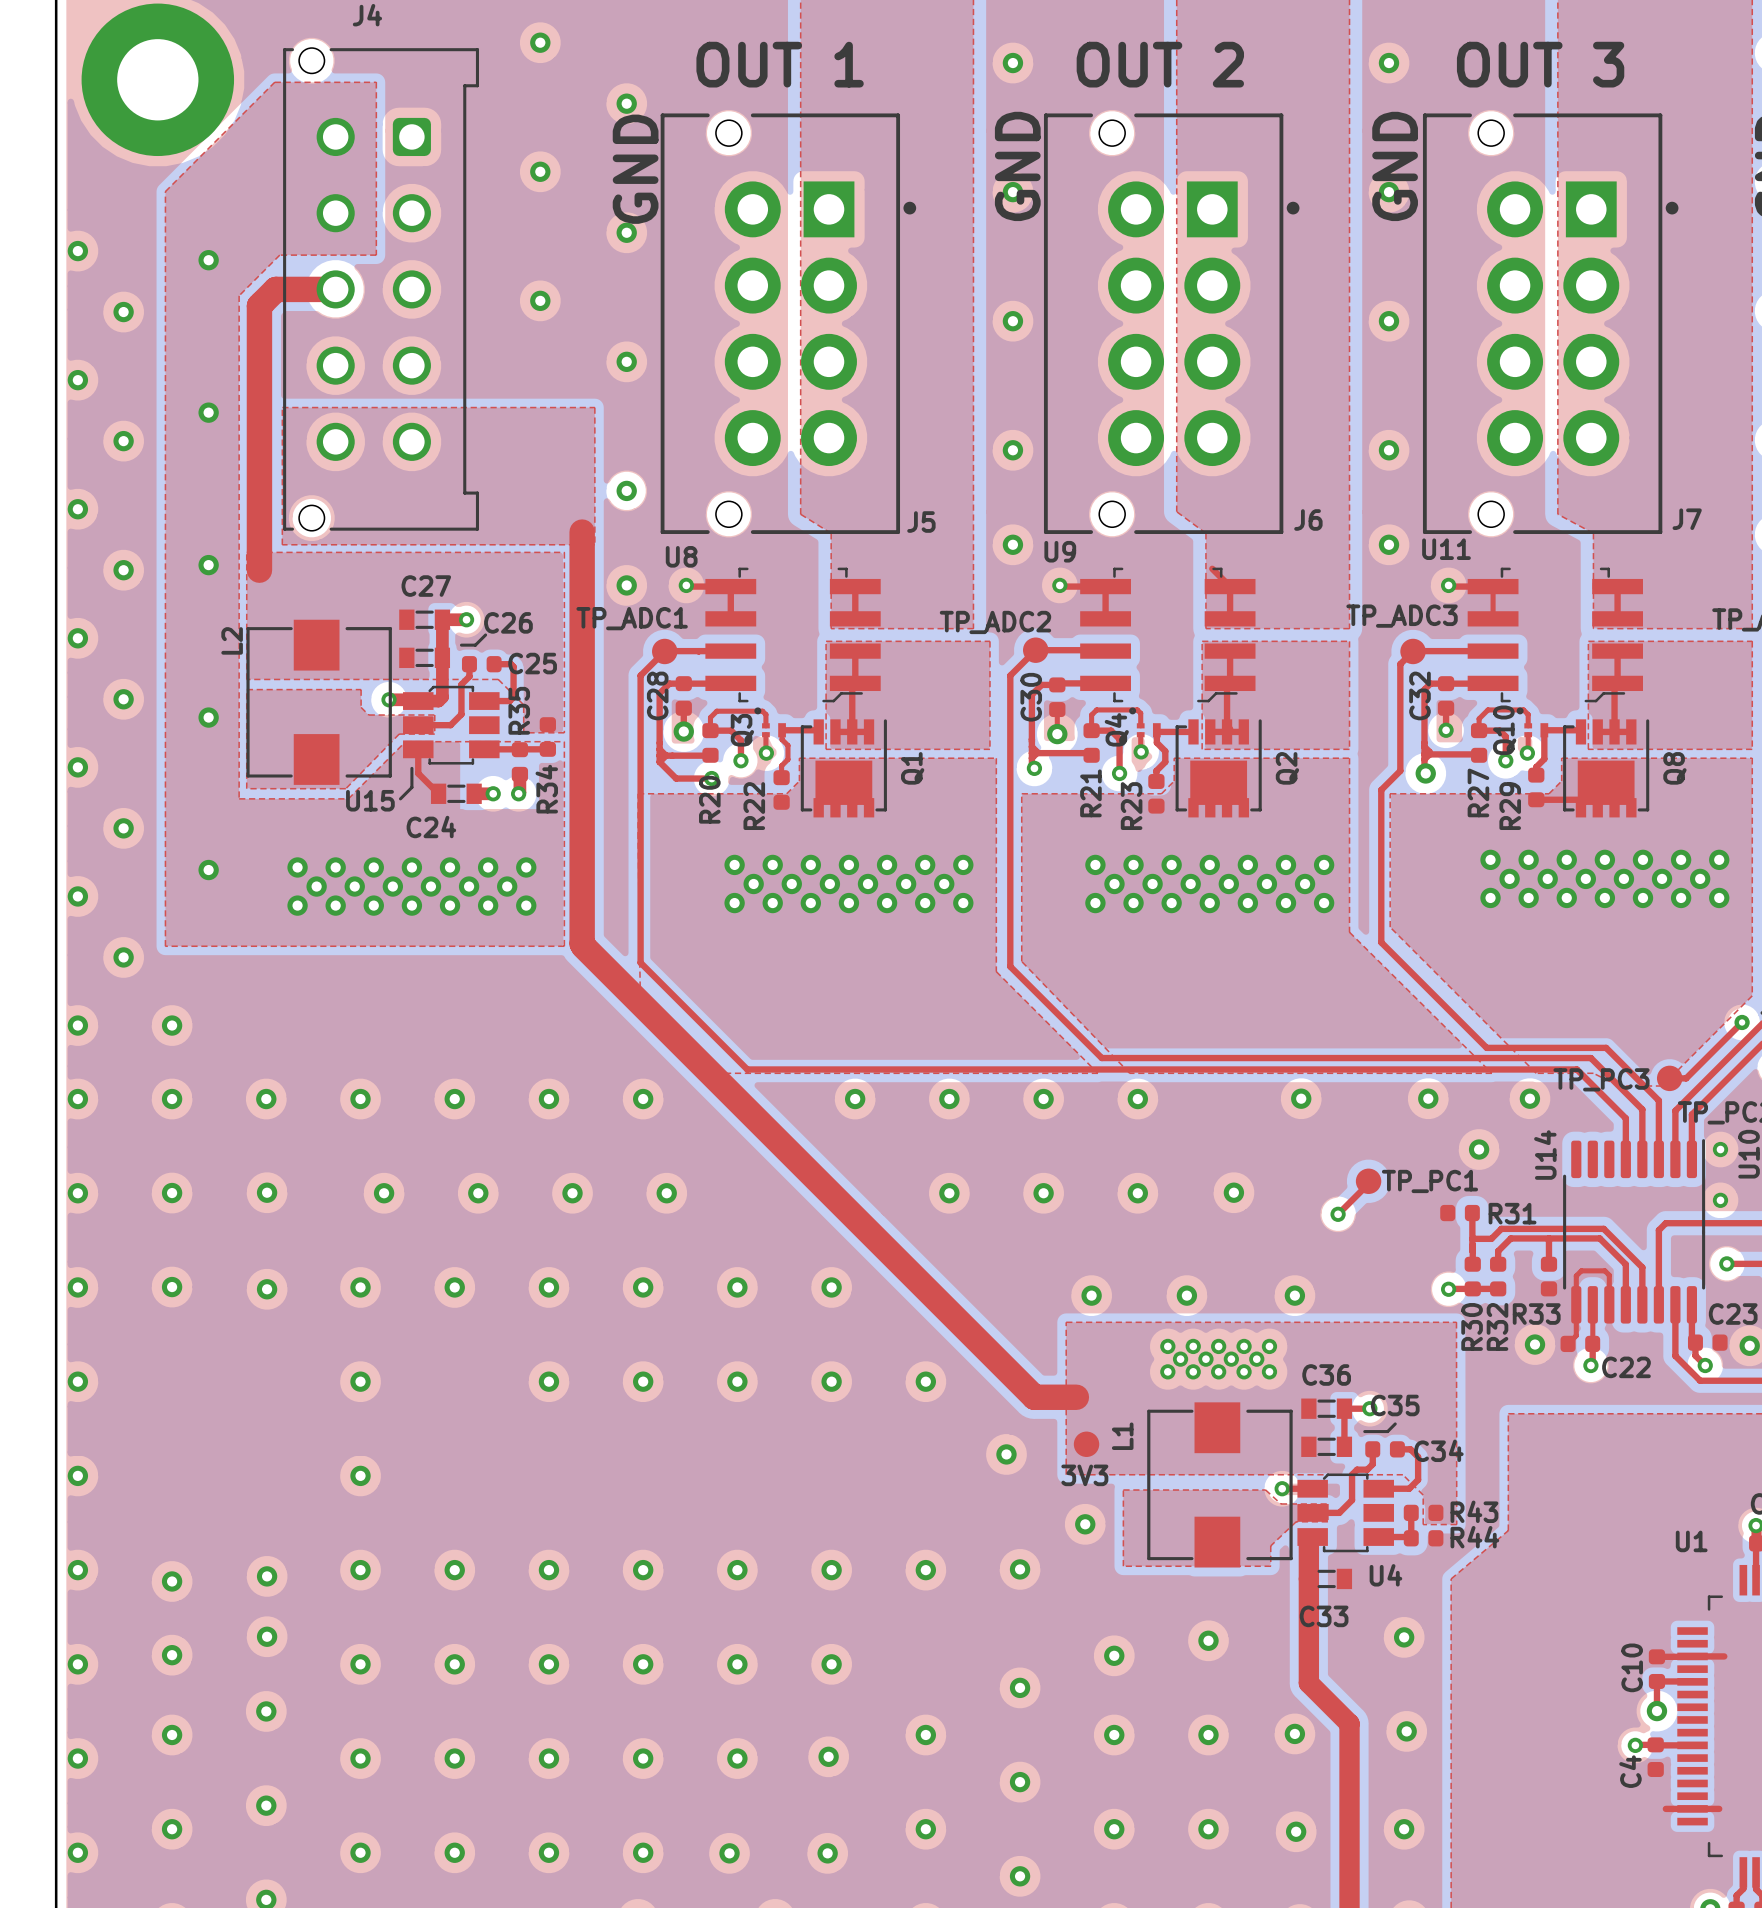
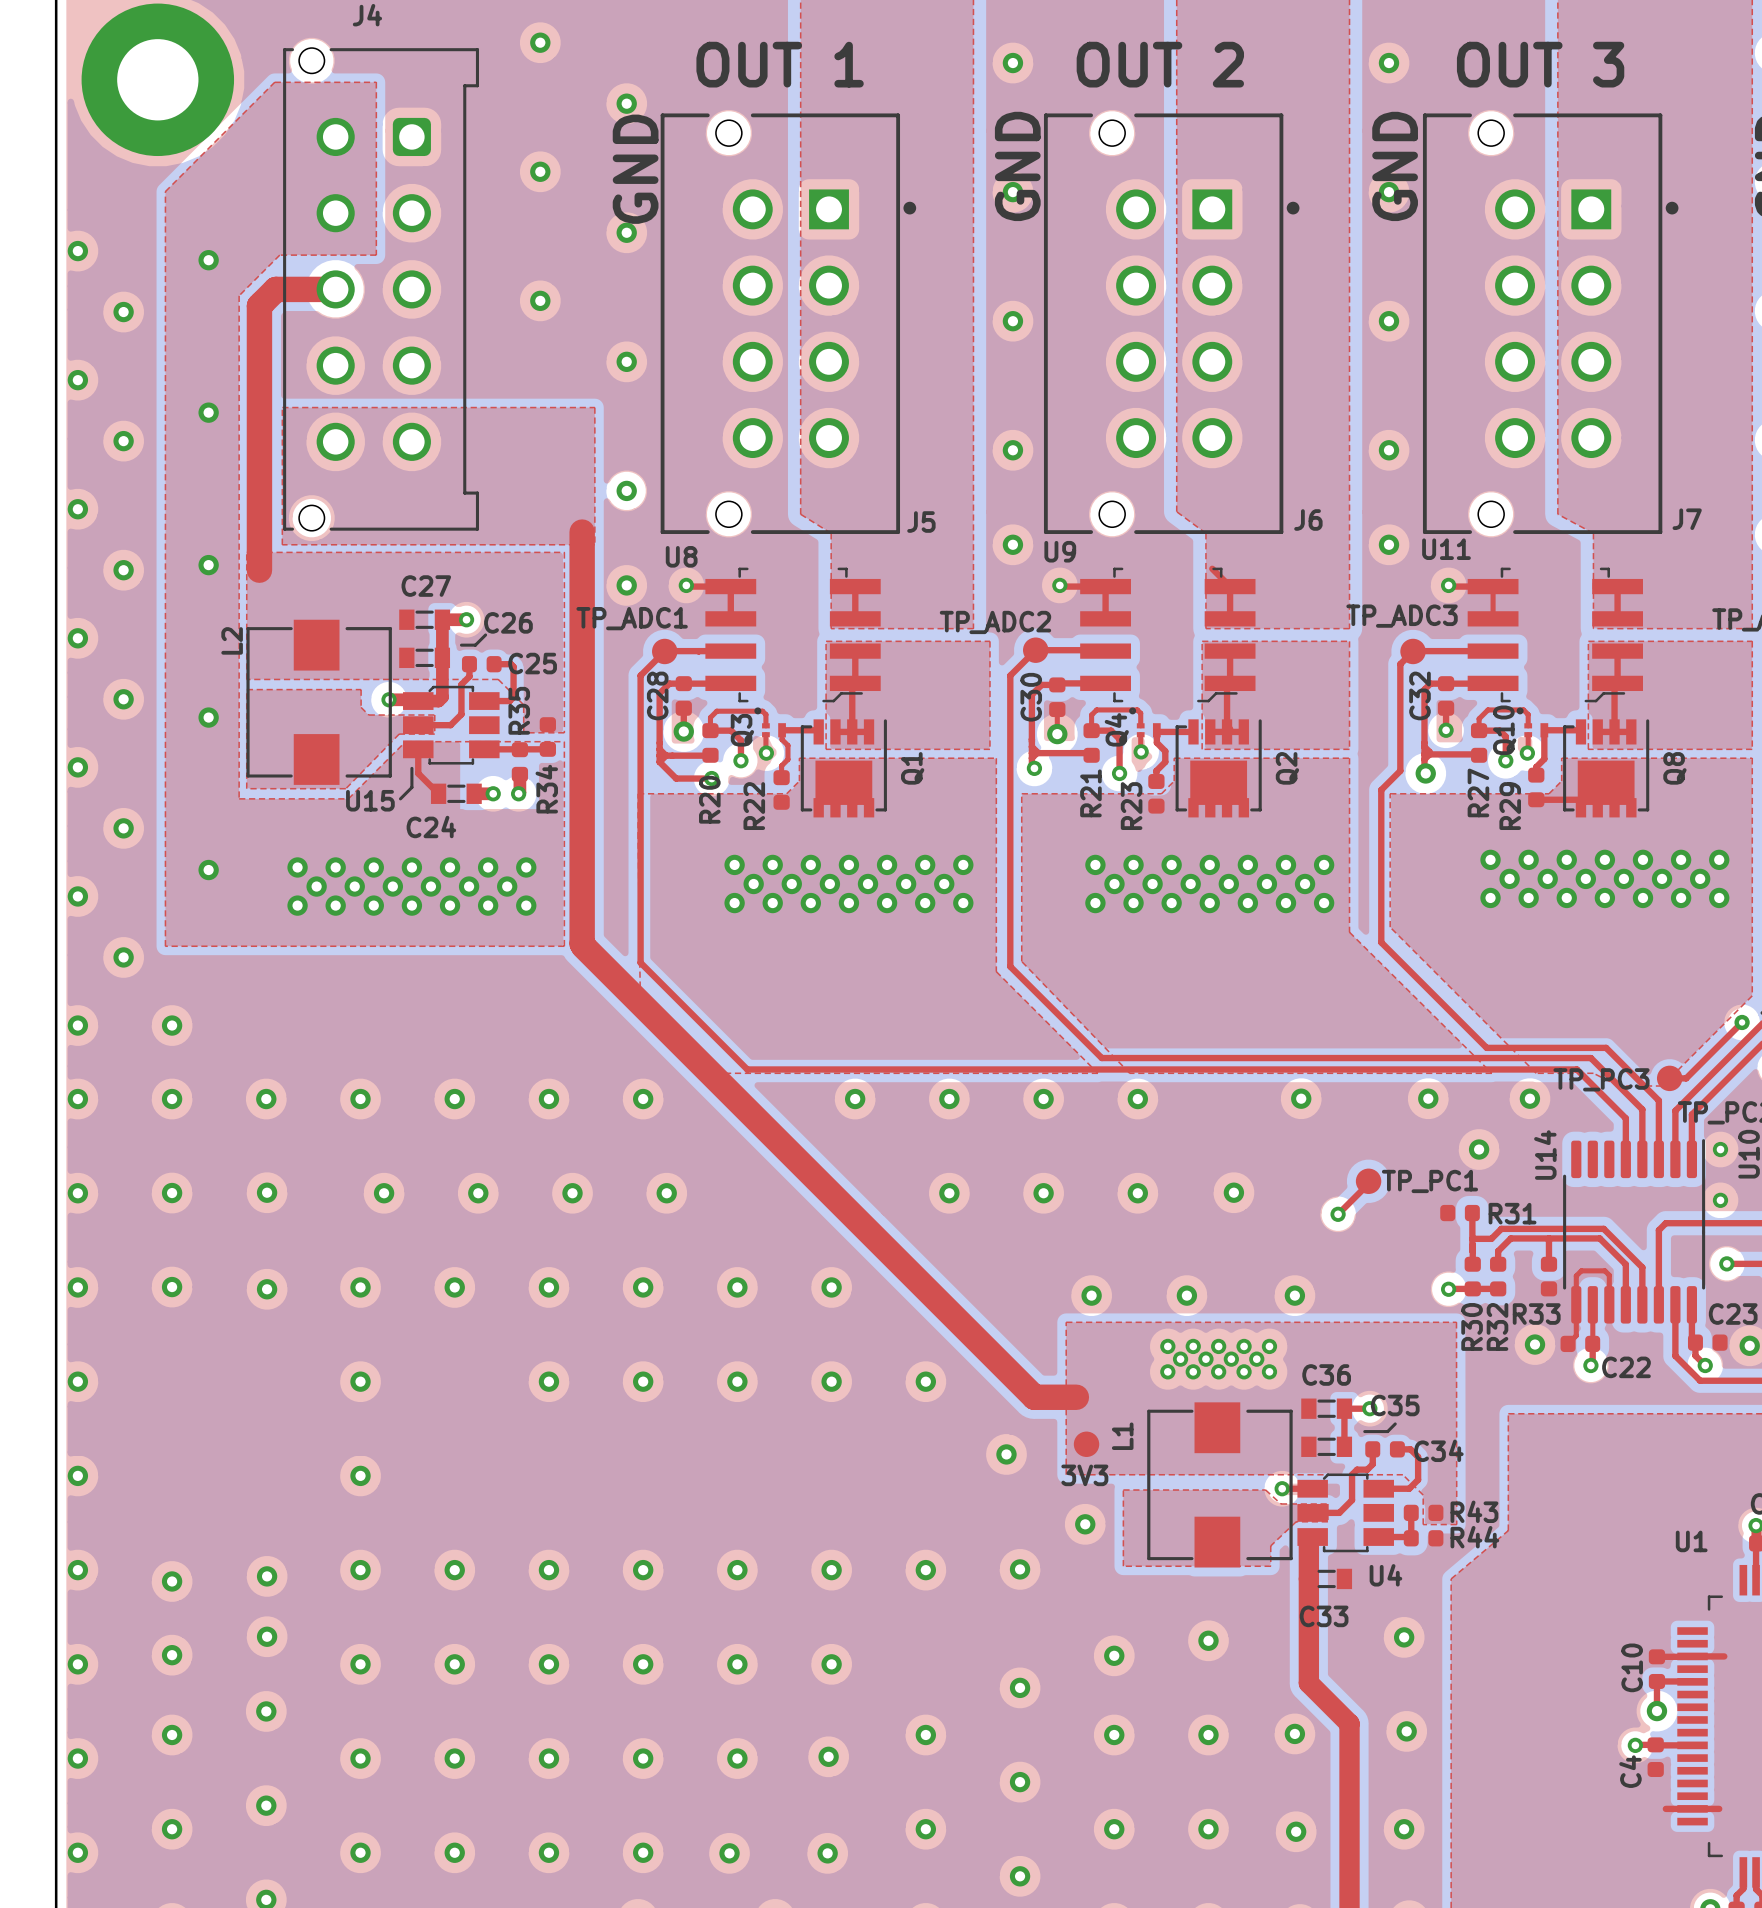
J5 footprint: [660, 113, 917, 534] -> [660, 113, 917, 534]
J6 footprint: [1043, 113, 1300, 534] -> [1043, 113, 1300, 534]
J7 footprint: [1422, 113, 1679, 534] -> [1422, 113, 1679, 534]

